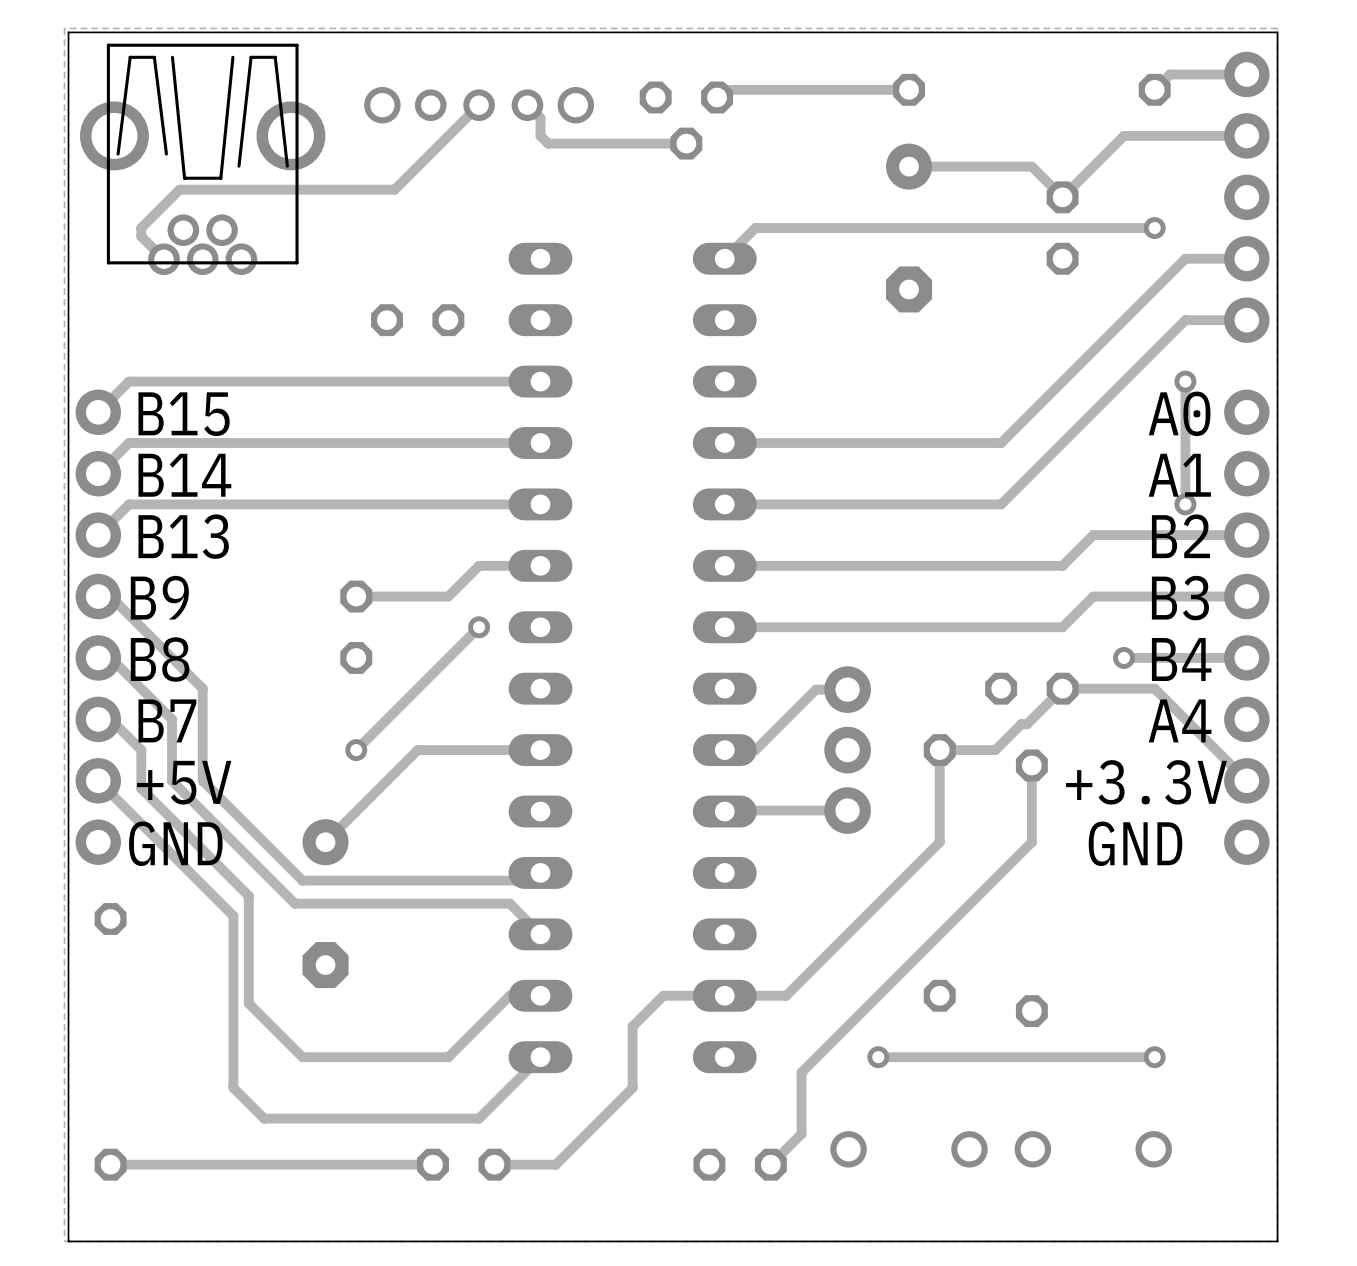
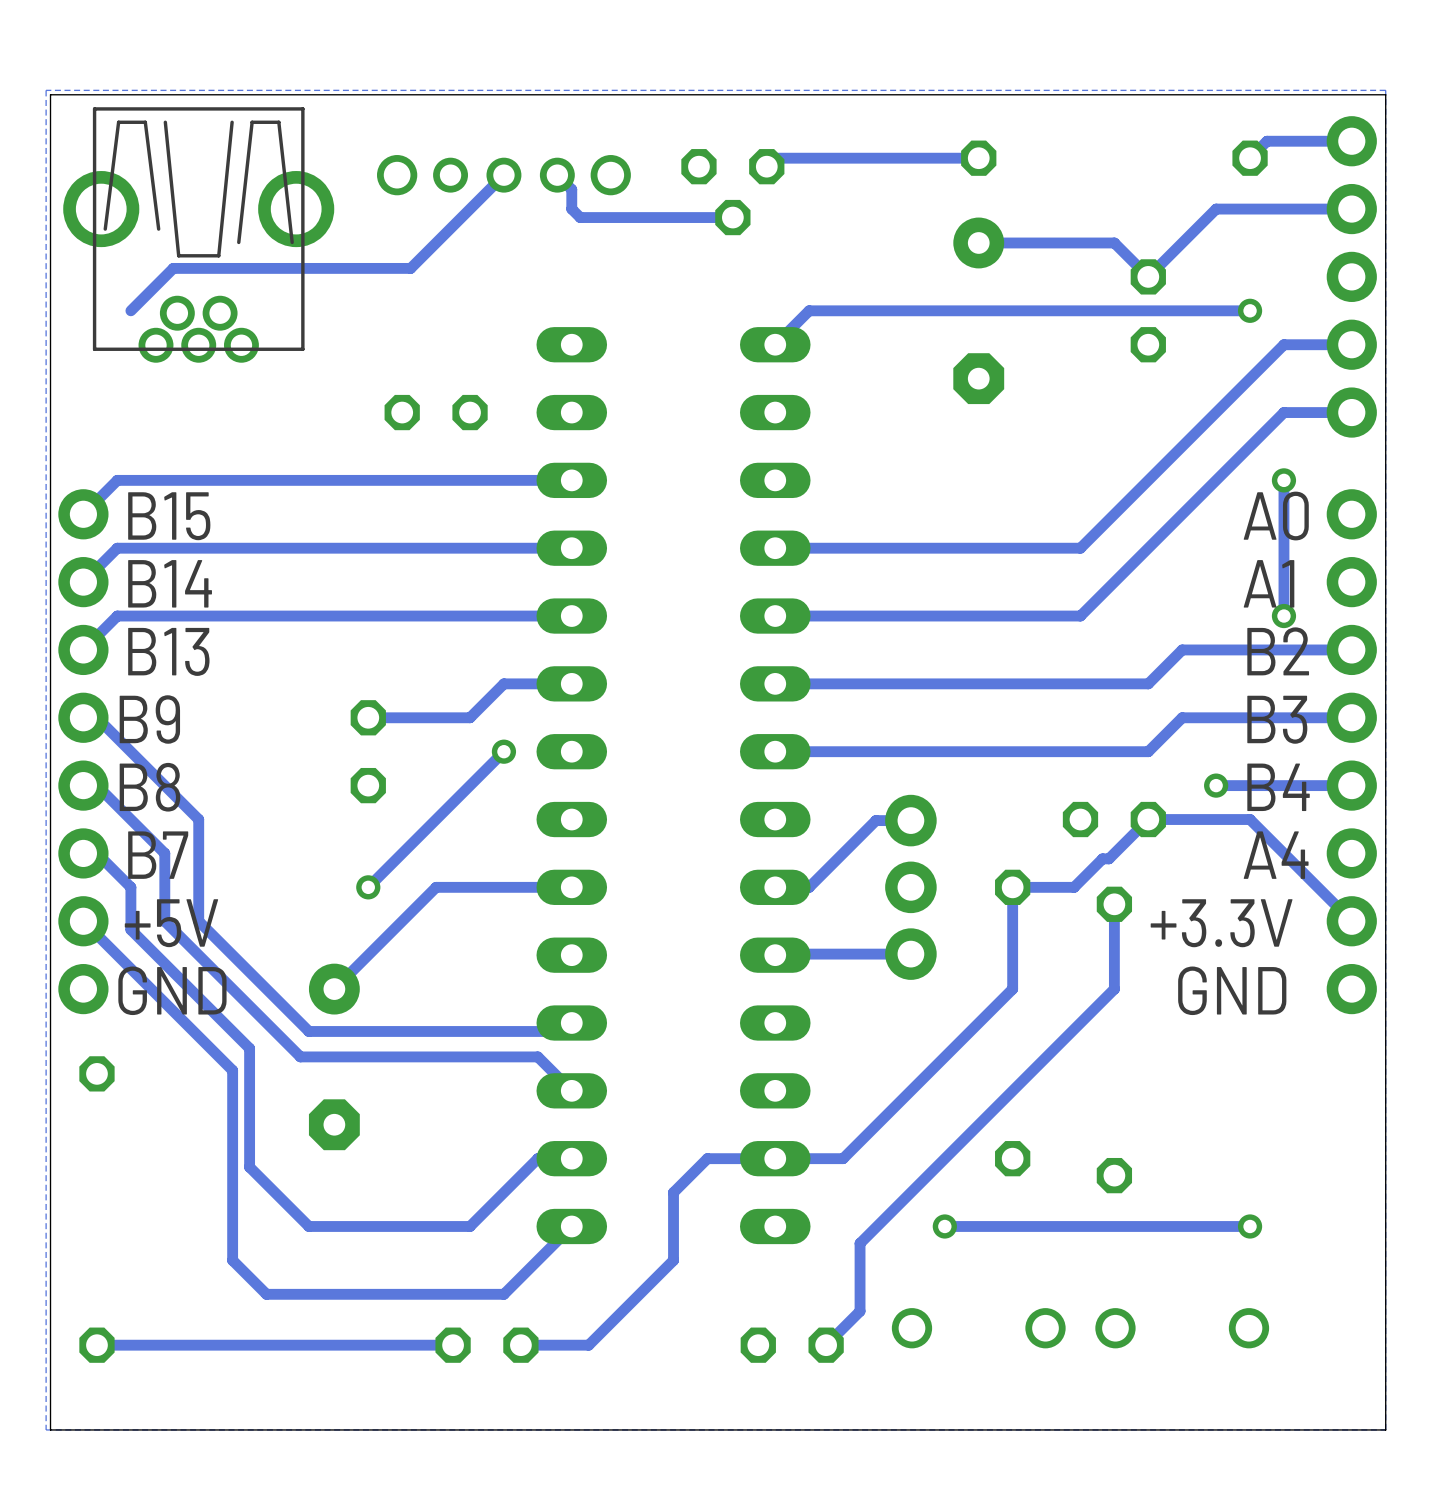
track: (141, 228) (141, 236) (164, 259) -> none

